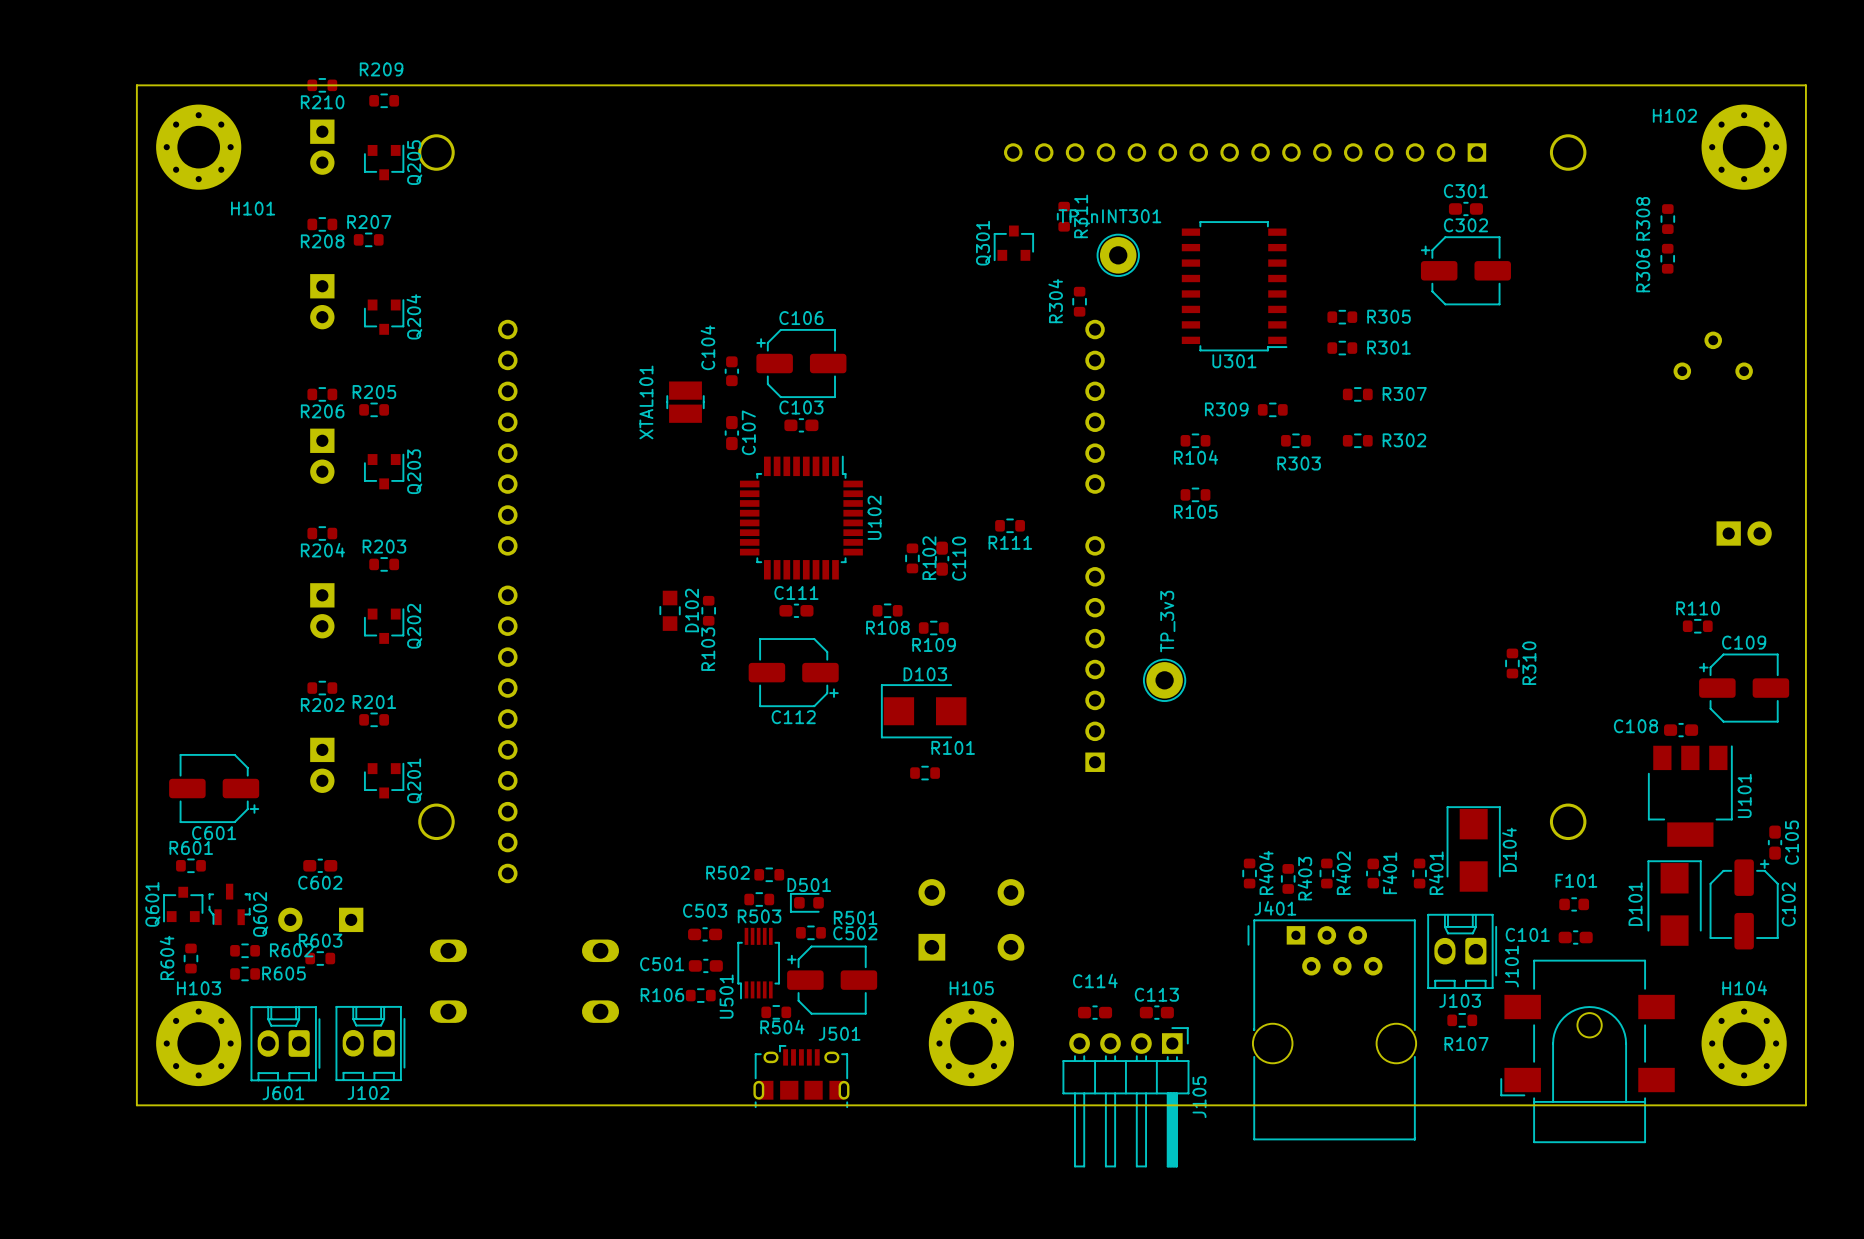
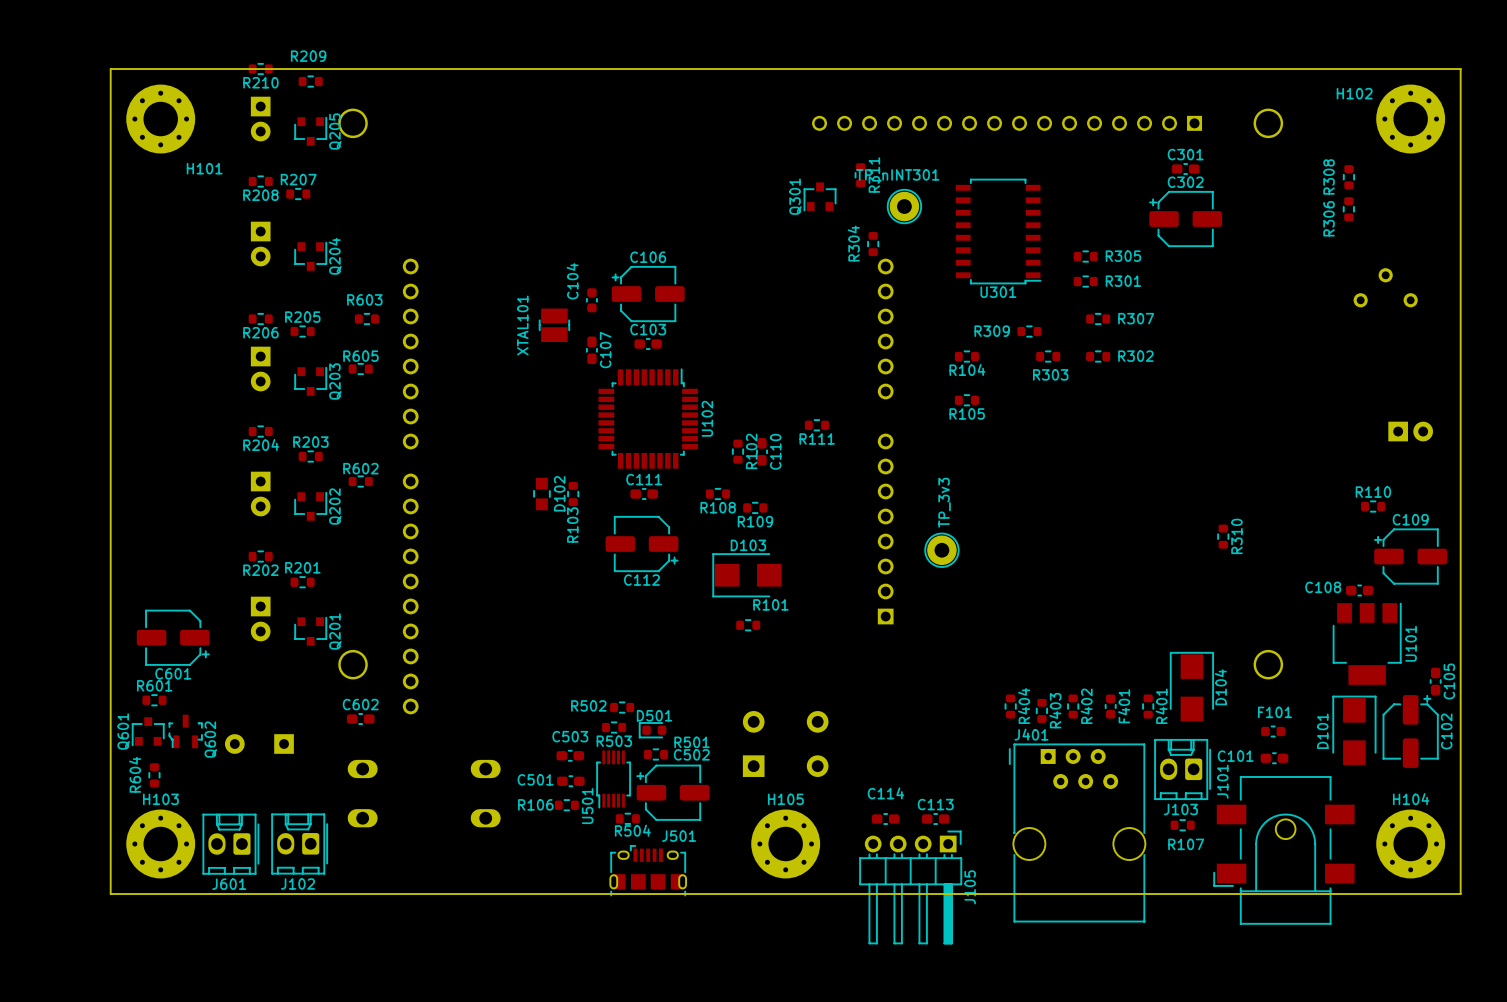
C602 position: (320, 865) -> (360, 719)
C602 name position: C602 (320, 882) -> C602 (360, 704)
R603 name position: R603 (320, 940) -> R603 (364, 299)
R602 position: (245, 950) -> (360, 481)
R602 name position: R602 (291, 950) -> R602 (360, 468)
R603 position: (320, 958) -> (366, 319)
R605 position: (245, 973) -> (360, 369)
R605 name position: R605 (283, 973) -> R605 (360, 356)

